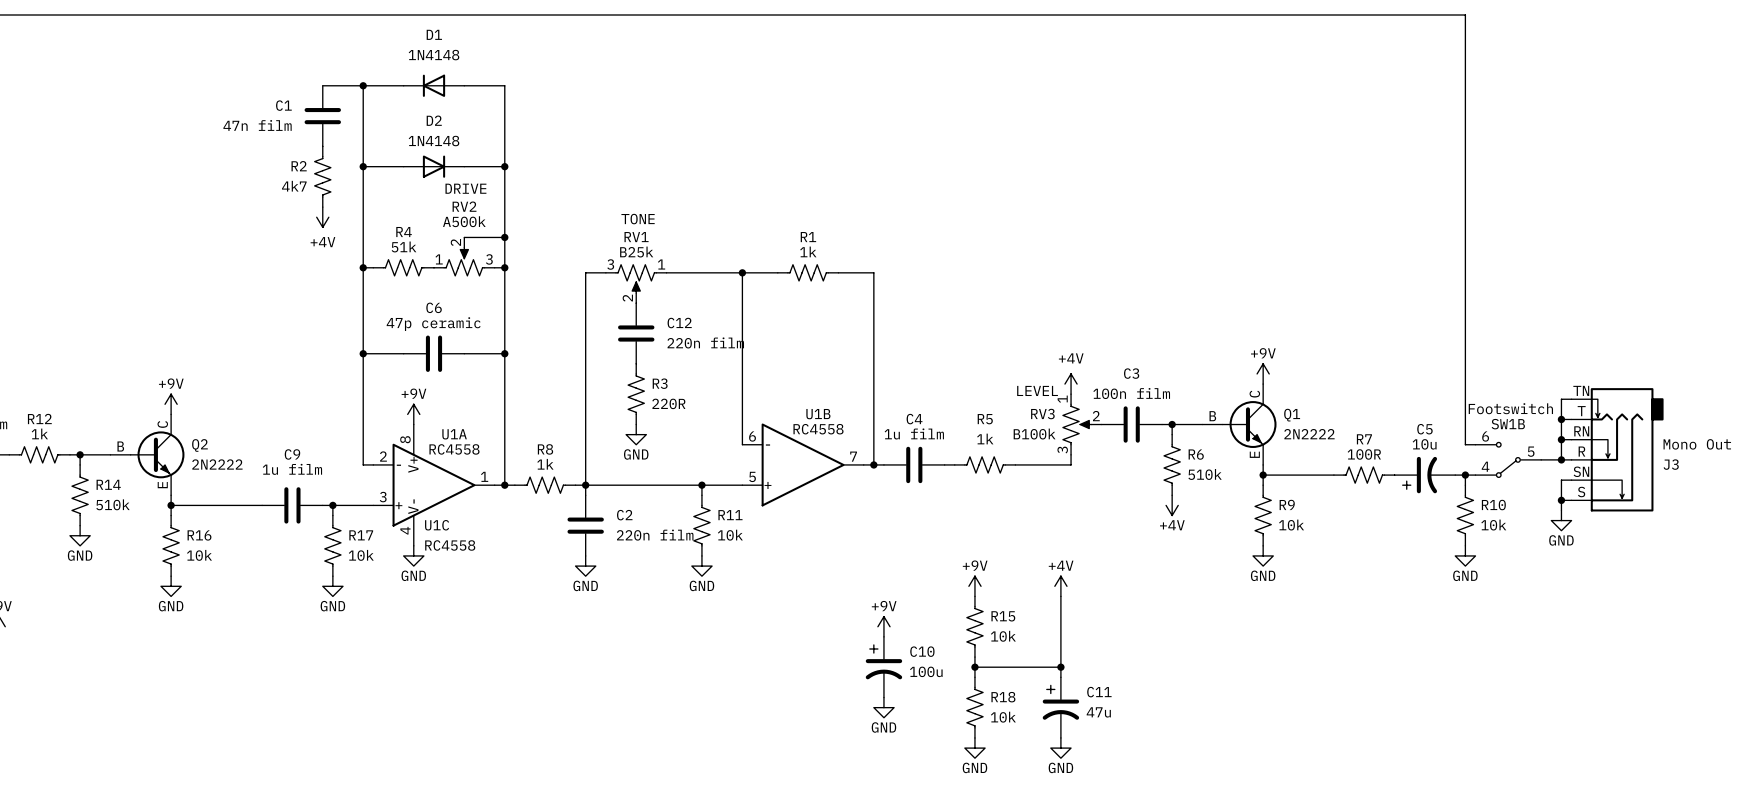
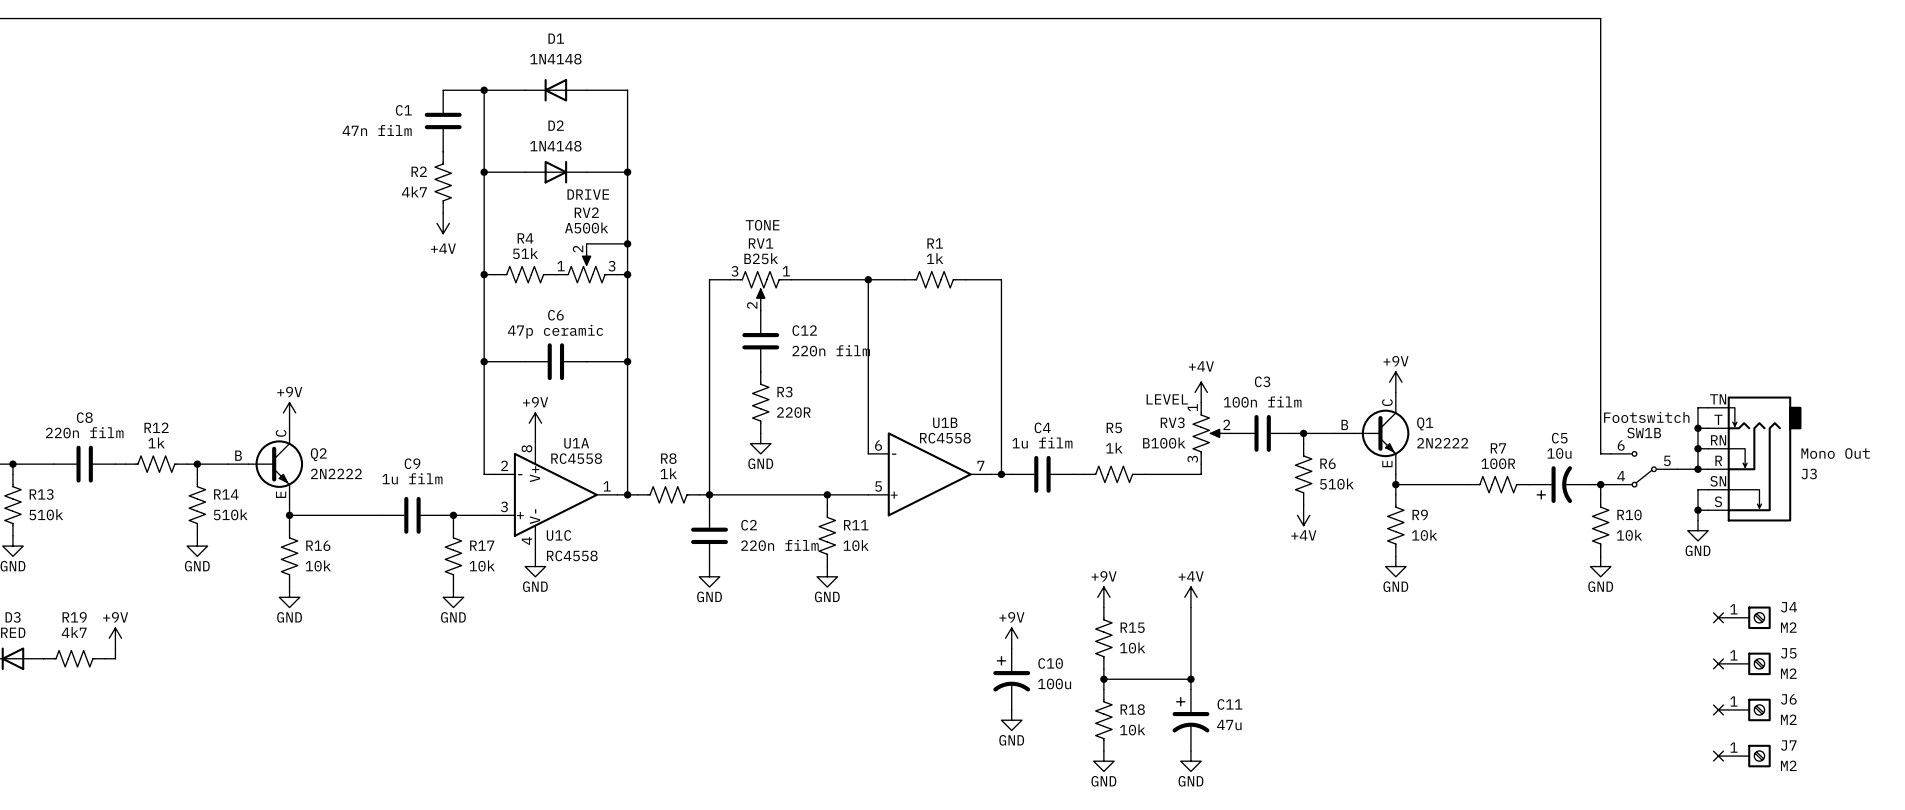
no-connect mark: none -> (1718, 617)
J4: none -> M2 (1744, 617)
no-connect mark: none -> (1718, 663)
J5: none -> M2 (1744, 663)
no-connect mark: none -> (1718, 709)
J6: none -> M2 (1744, 709)
no-connect mark: none -> (1718, 756)
J7: none -> M2 (1744, 756)

